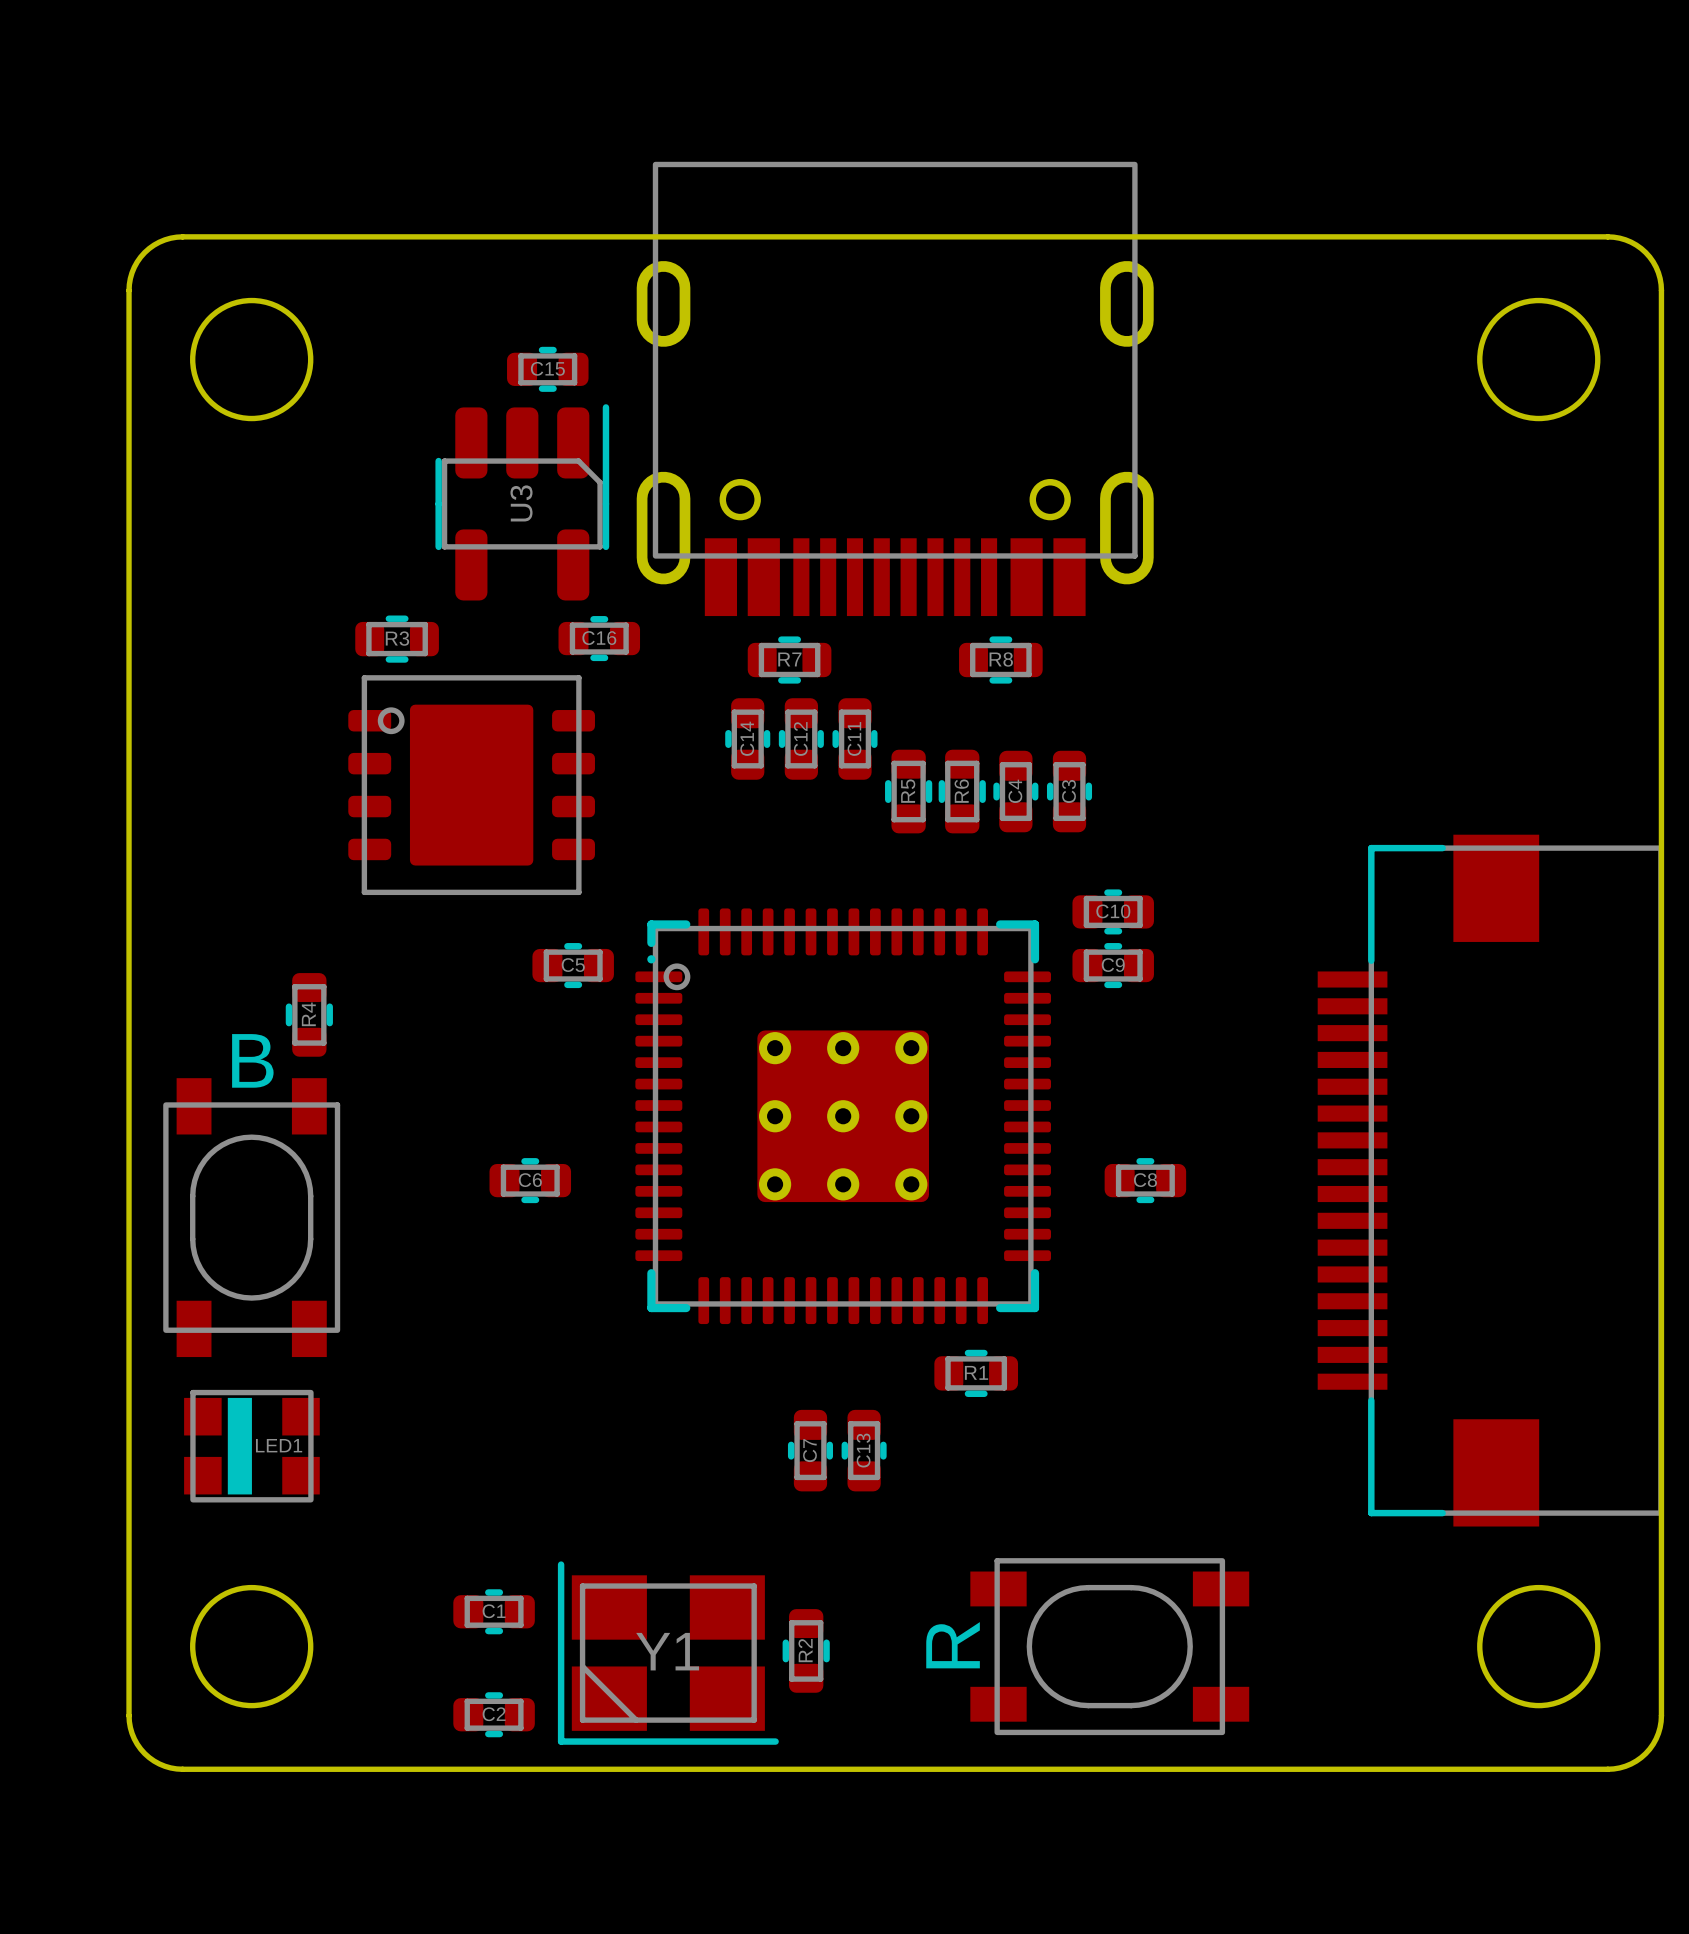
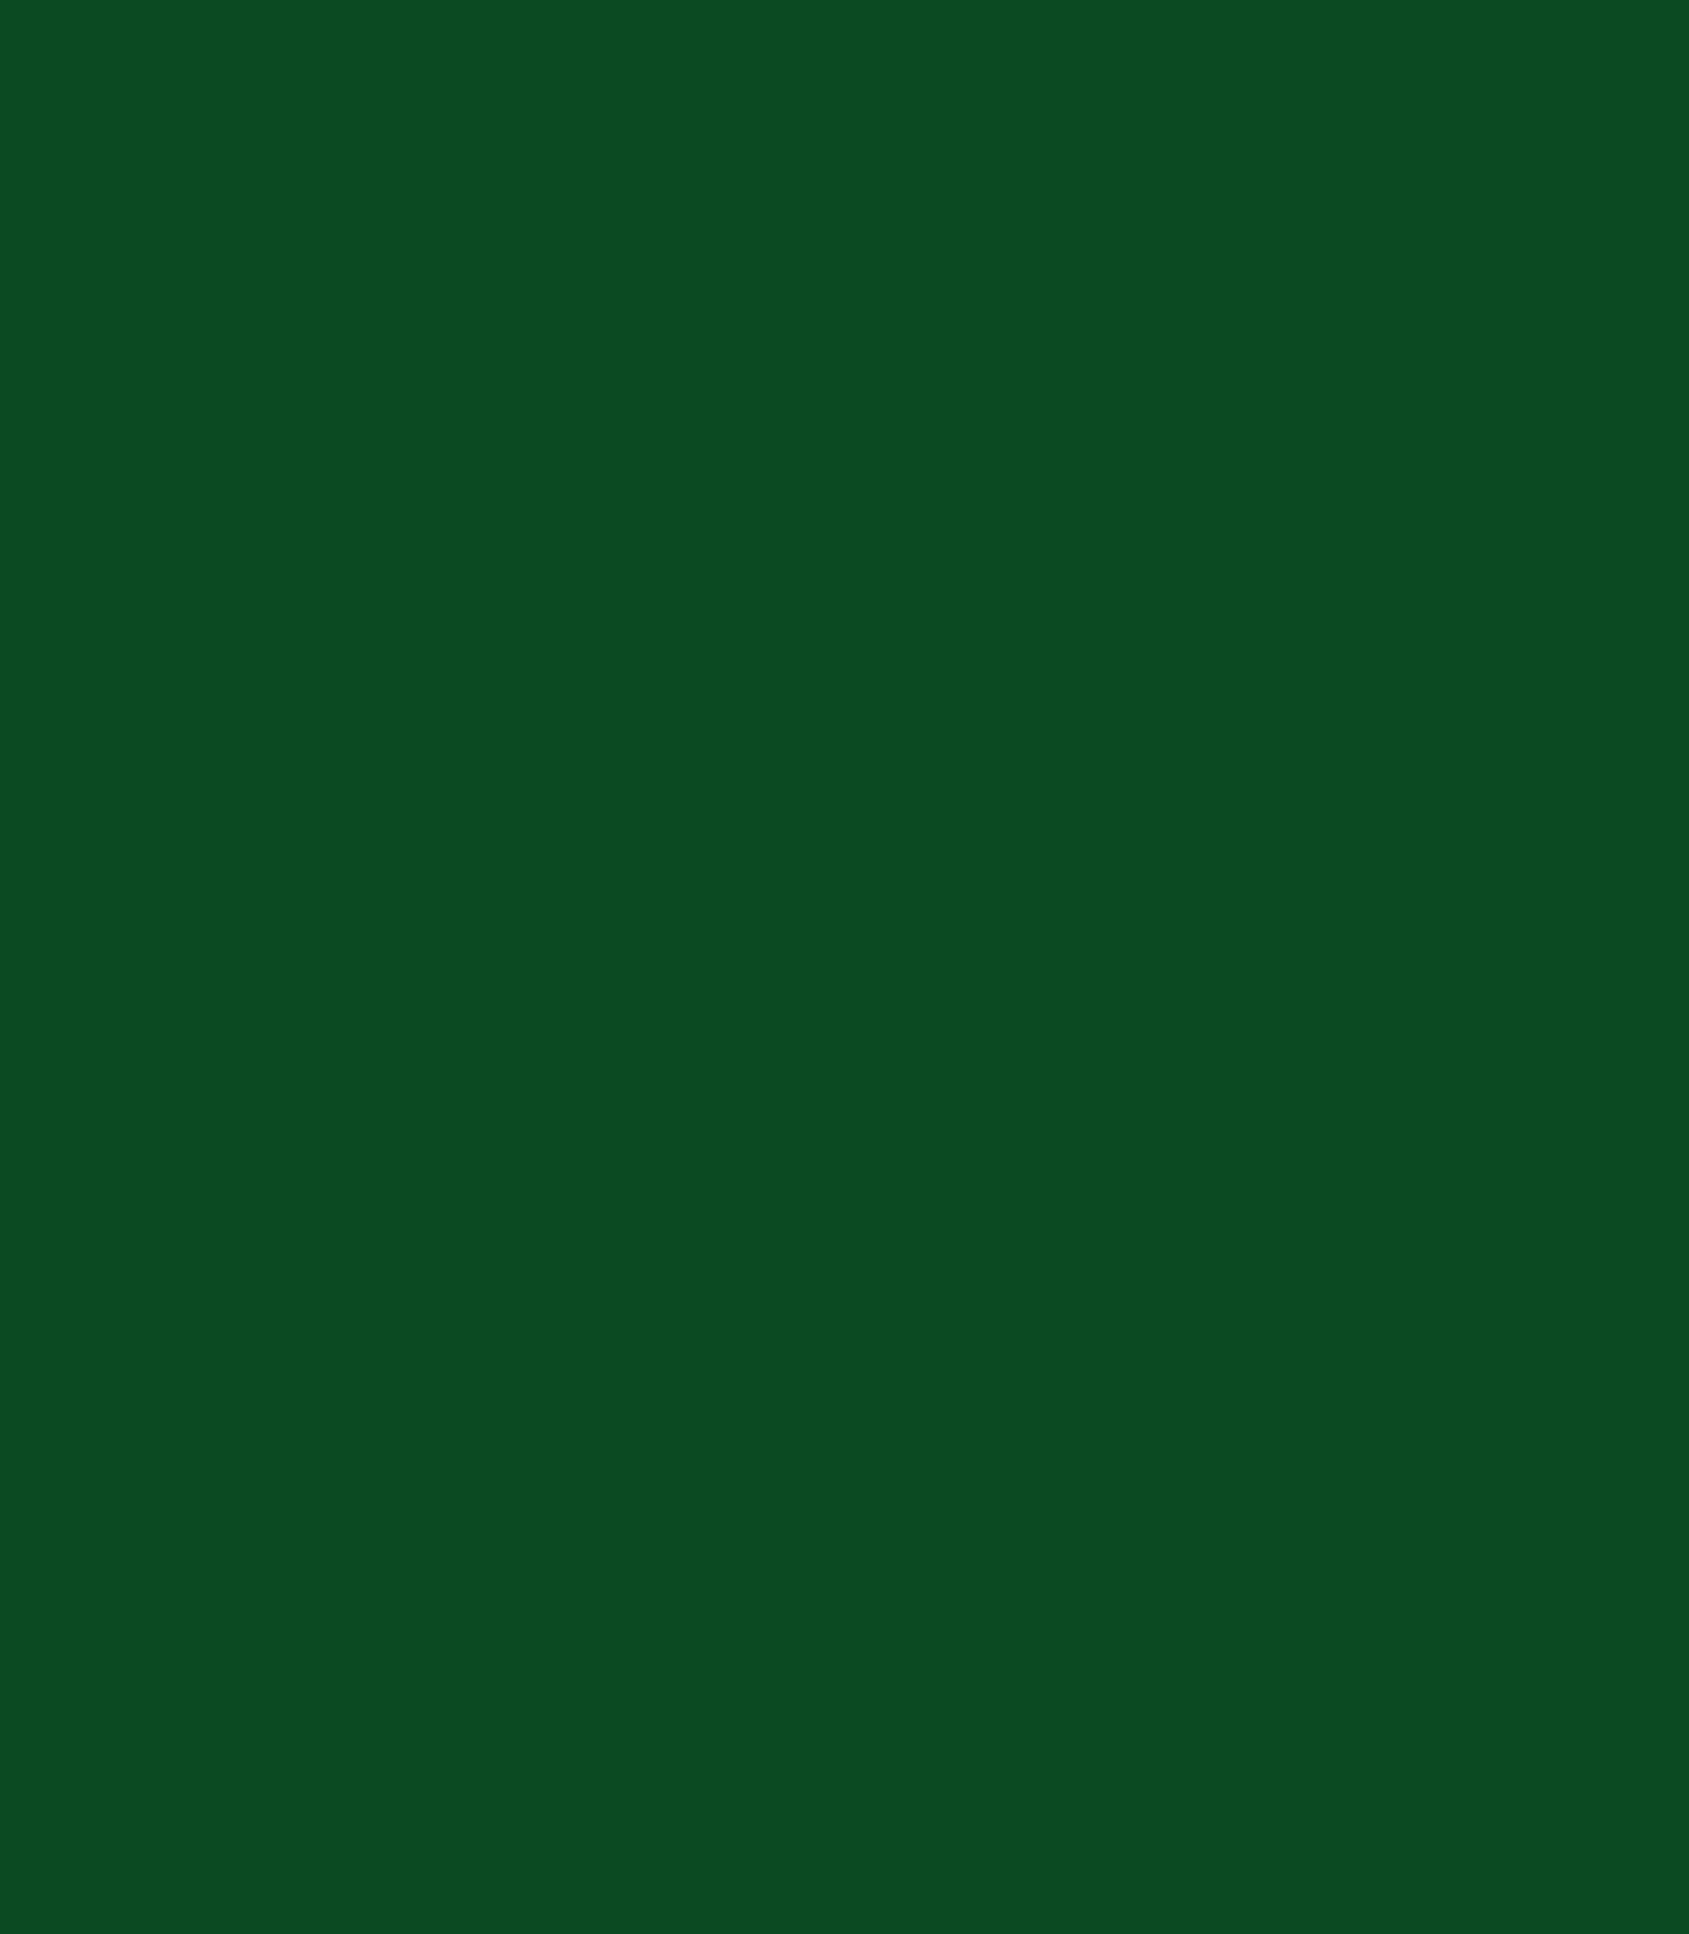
board edge: (182, 236) (1607, 236) (1631, 242) (1645, 252) (1656, 267) (1661, 290) (1661, 1715) (1656, 1738) (1645, 1753) (1631, 1763) (1607, 1769) (182, 1769) (159, 1763) (144, 1753) (132, 1733) (129, 1715) (129, 290) (132, 272) (144, 252) (164, 239) (182, 236) -> none
round board edge: [190, 297, 314, 422] -> none
round board edge: [1477, 297, 1601, 422] -> none
C15: (547, 369) -> none
part: (895, 388) -> none
U3: (522, 502) -> none
C16: (599, 638) -> none
R3: (397, 639) -> none
R7: (789, 660) -> none
R8: (1000, 660) -> none
C14: (747, 738) -> none
C12: (801, 738) -> none
C11: (854, 738) -> none
part: (471, 785) -> none
R5: (908, 791) -> none
R6: (962, 791) -> none
C4: (1015, 791) -> none
C3: (1069, 791) -> none
C10: (1113, 911) -> none
C5: (573, 965) -> none
C9: (1113, 965) -> none
R4: (309, 1014) -> none
text: B (252, 1060) -> none
part: (843, 1116) -> none
C6: (530, 1180) -> none
C8: (1145, 1180) -> none
part: (1490, 1180) -> none
part: (251, 1217) -> none
R1: (976, 1373) -> none
LED1: (251, 1446) -> none
C7: (810, 1450) -> none
C13: (864, 1450) -> none
round board edge: [190, 1584, 314, 1709] -> none
round board edge: [1477, 1584, 1601, 1709] -> none
C1: (494, 1611) -> none
text: R (953, 1645) -> none
part: (1109, 1646) -> none
R2: (806, 1650) -> none
Y1: (668, 1653) -> none
C2: (494, 1714) -> none

